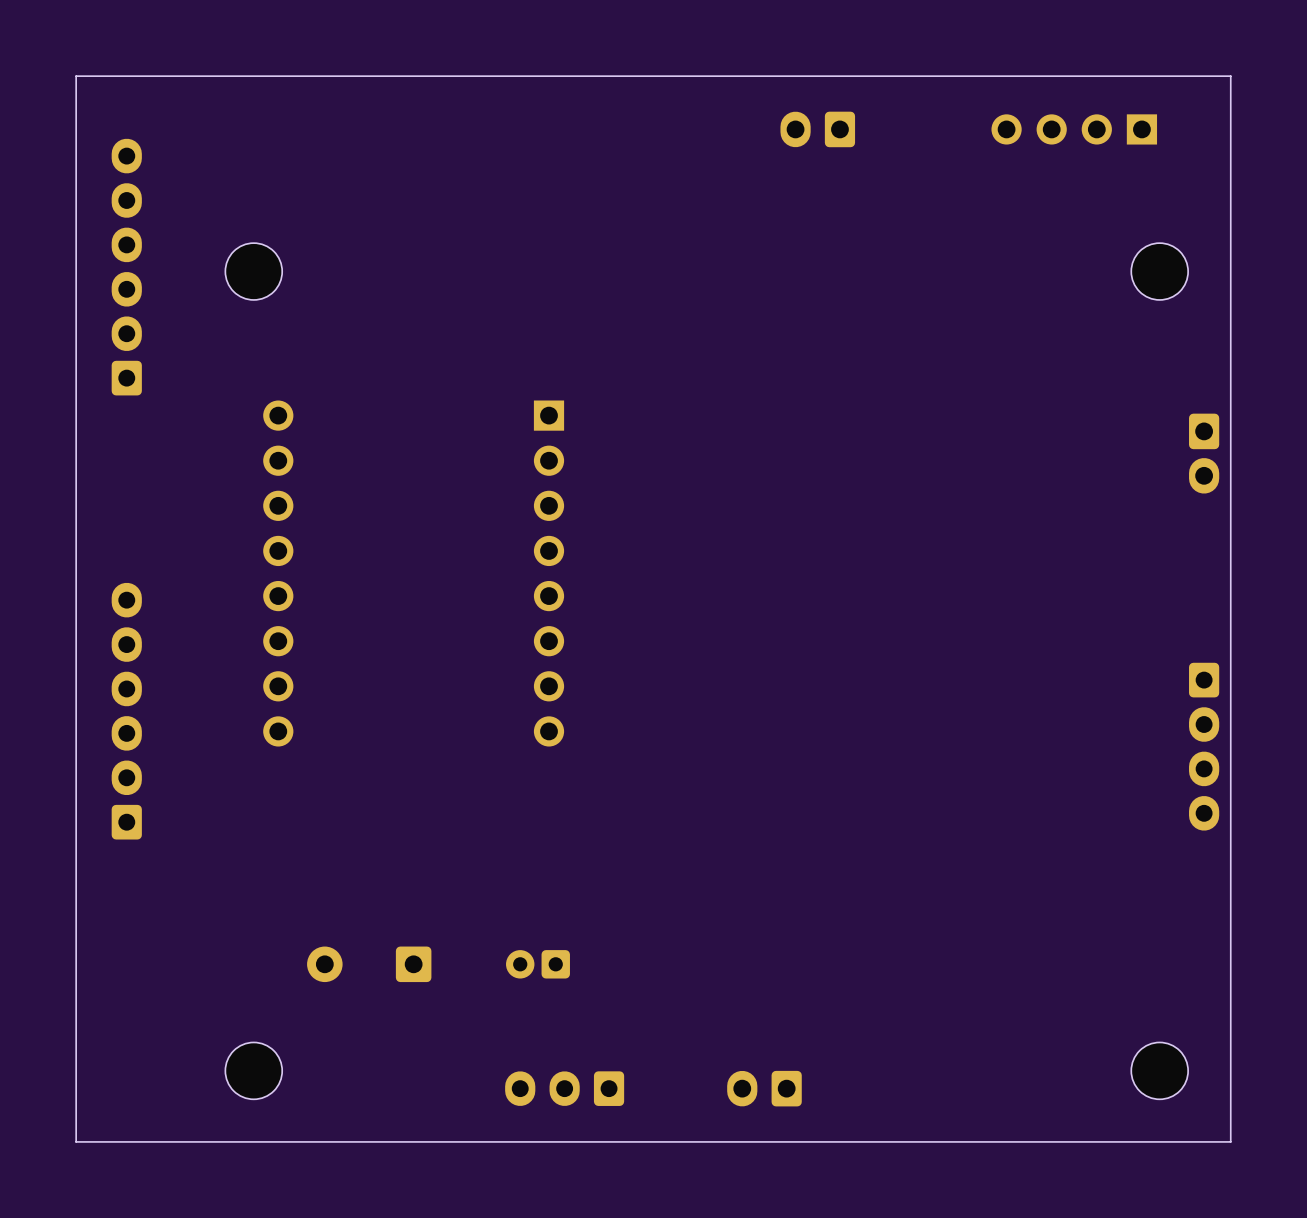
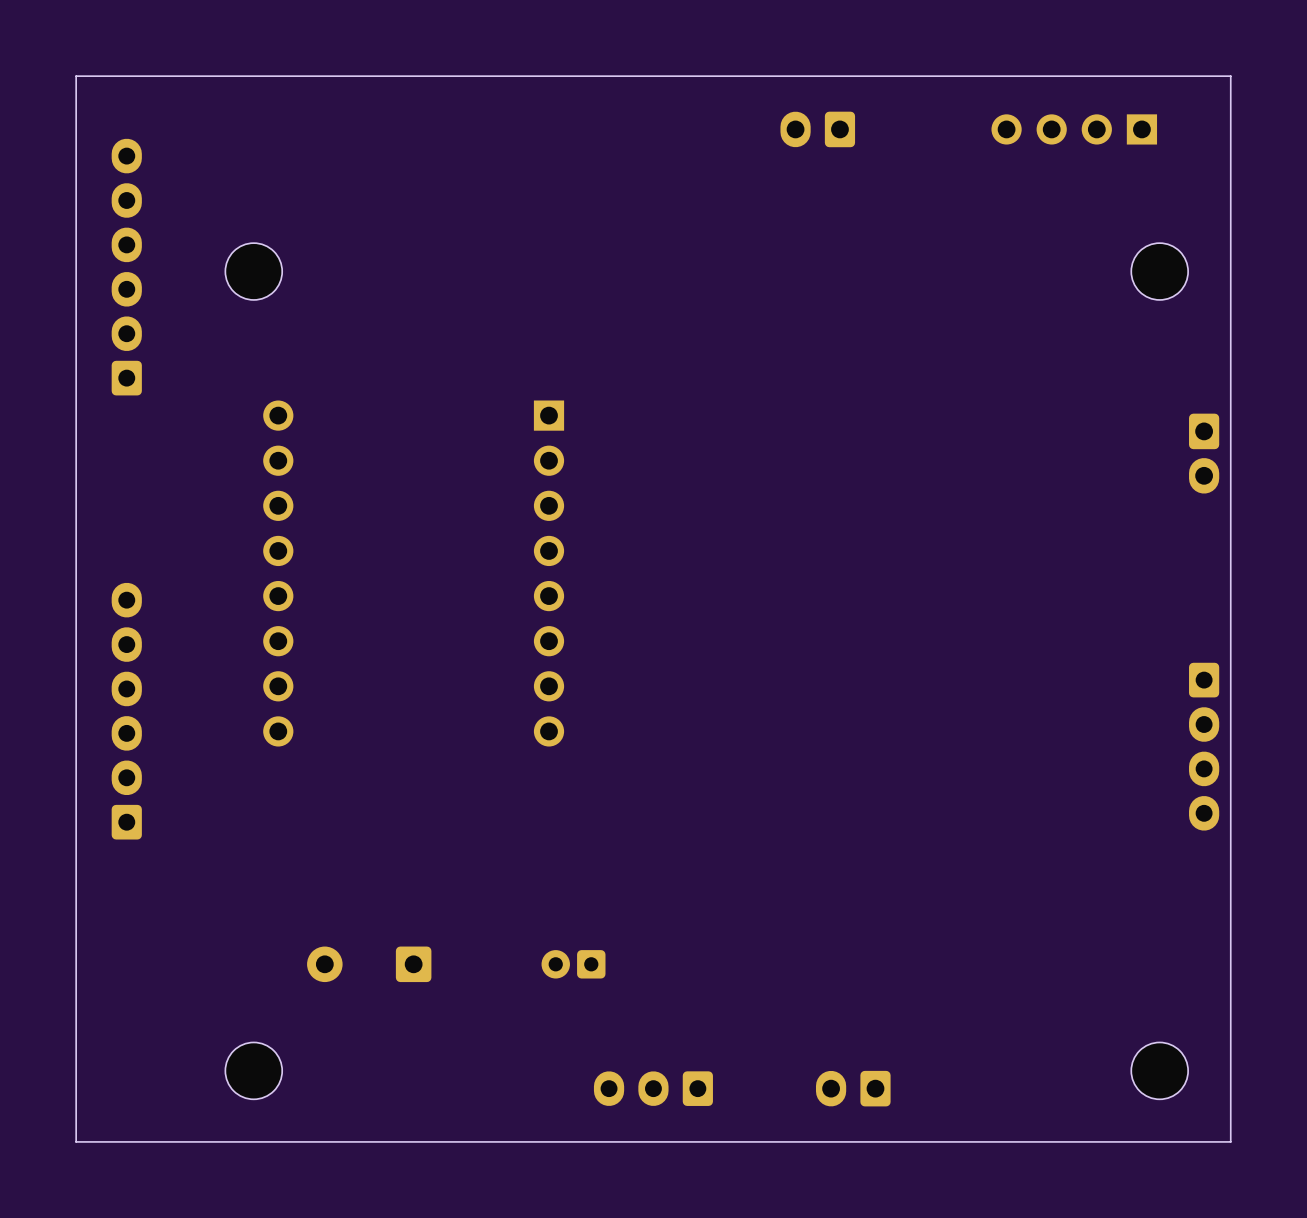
part position: (537, 964) -> (573, 964)
part position: (564, 1088) -> (653, 1088)
part position: (764, 1088) -> (853, 1088)

